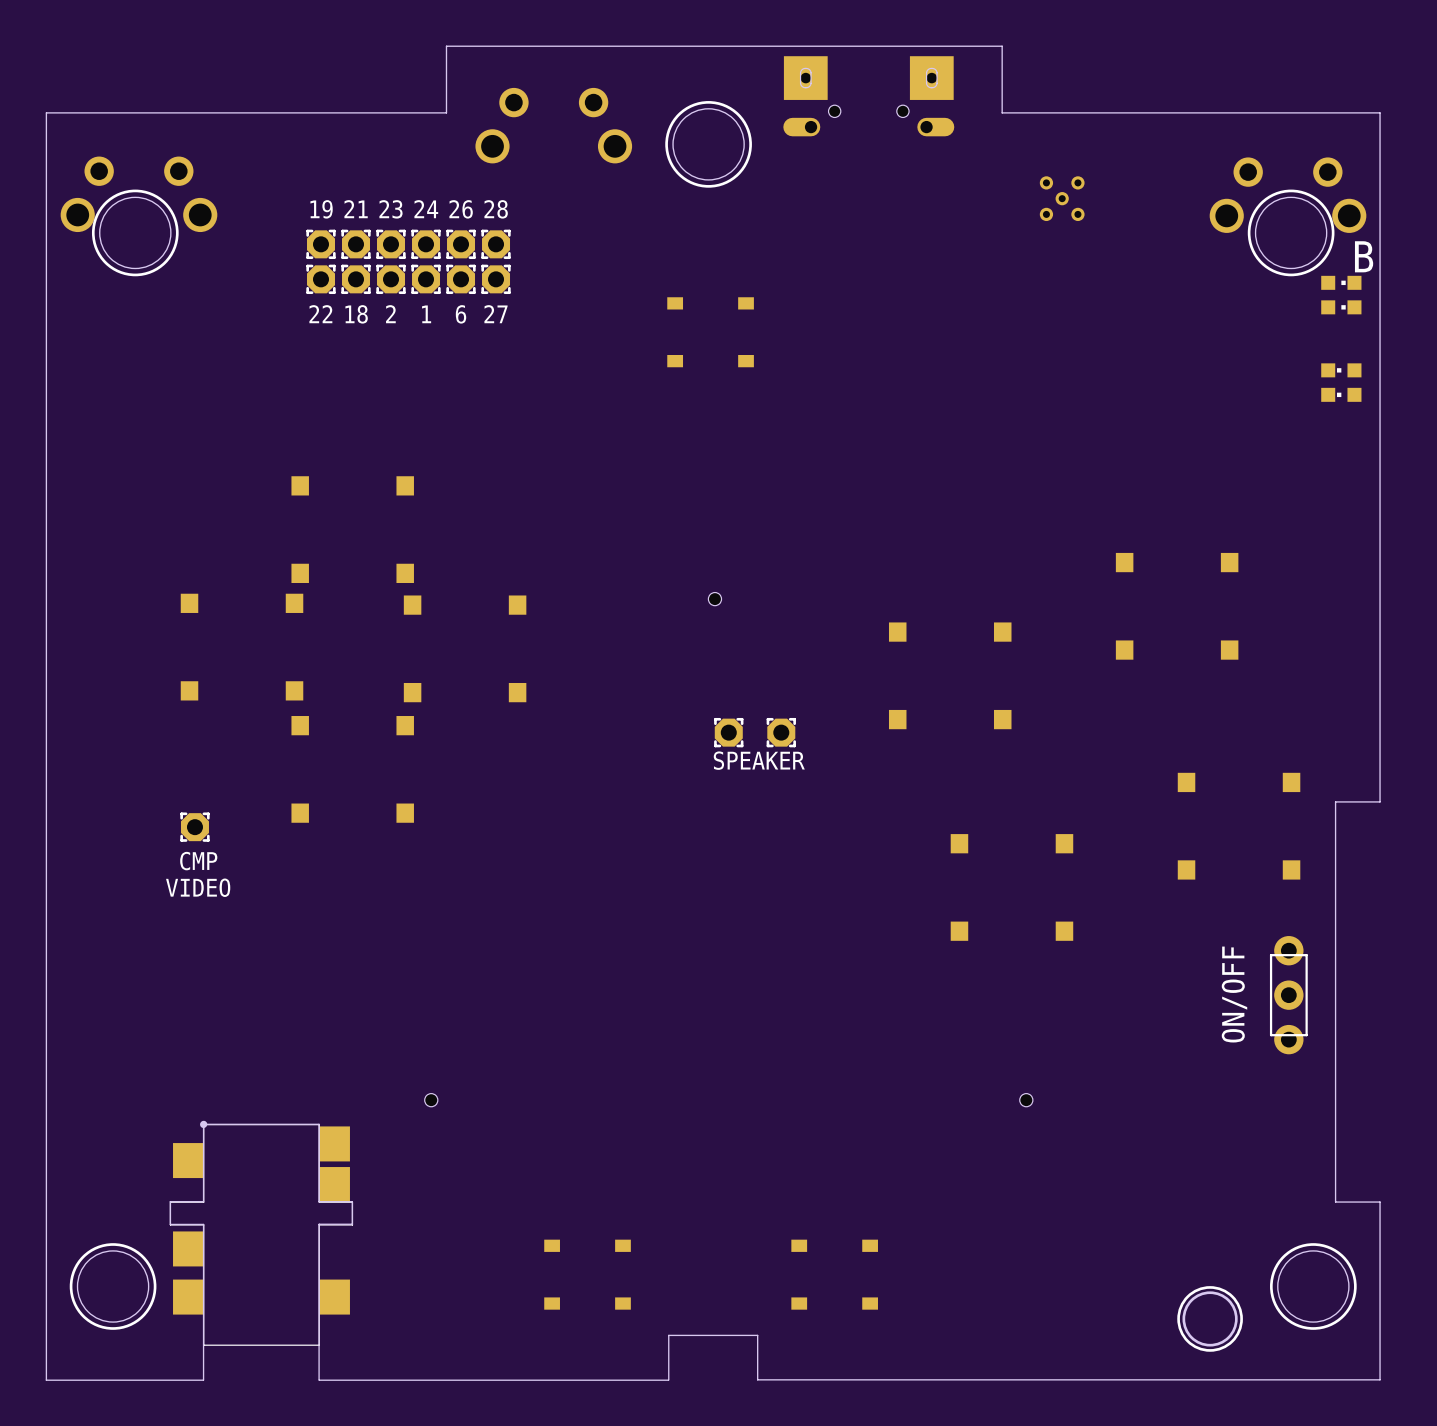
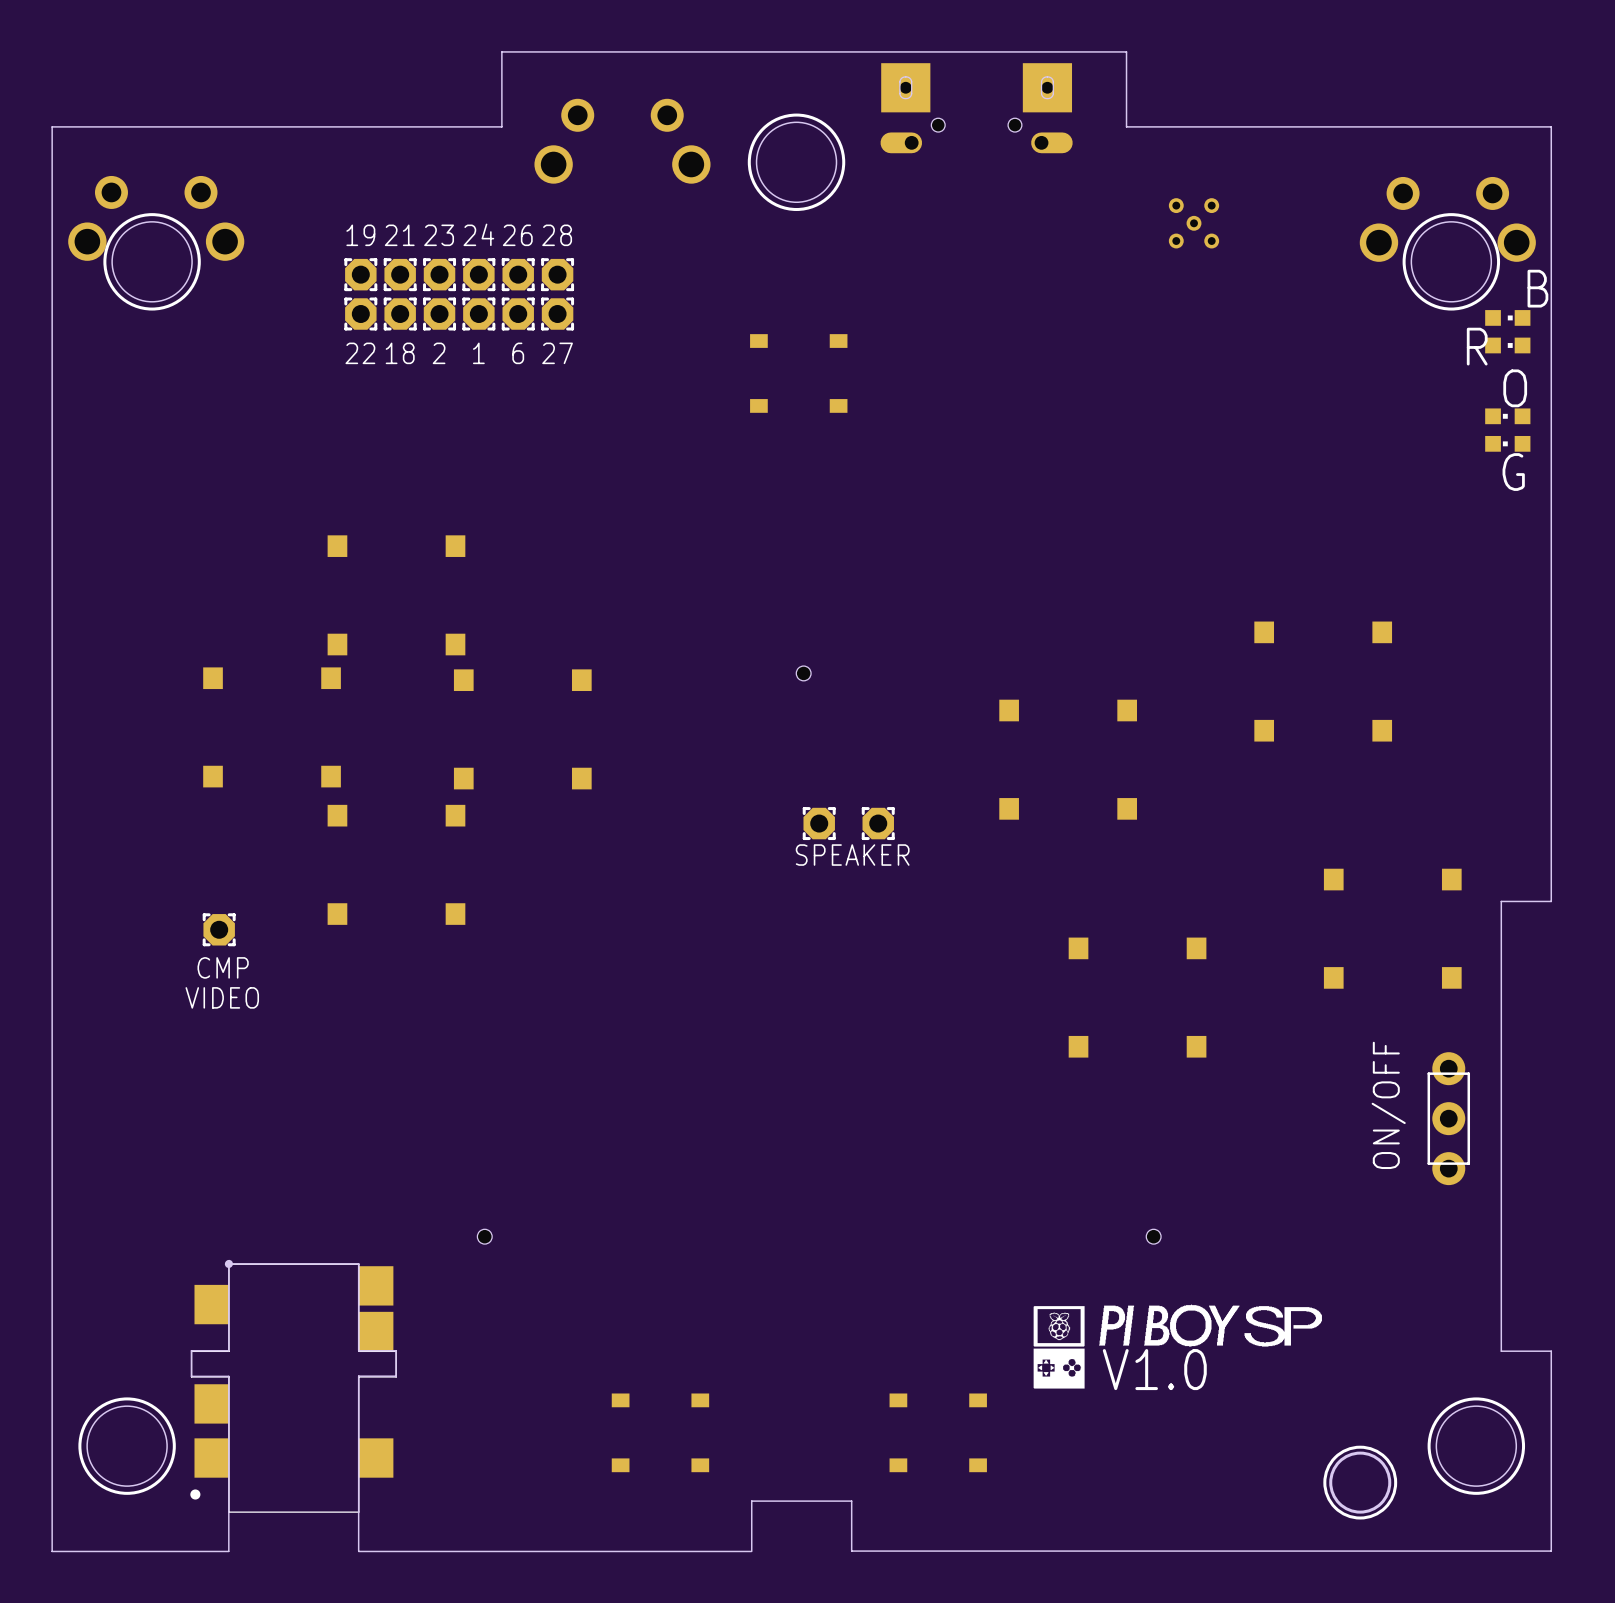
text: none -> R (1477, 346)
text: none -> O (1515, 388)
text: none -> G (1513, 472)
drawing: none -> [1033, 1304, 1322, 1389]
text: none -> V1.0 (1154, 1369)
drawing: none -> [190, 1489, 201, 1500]

